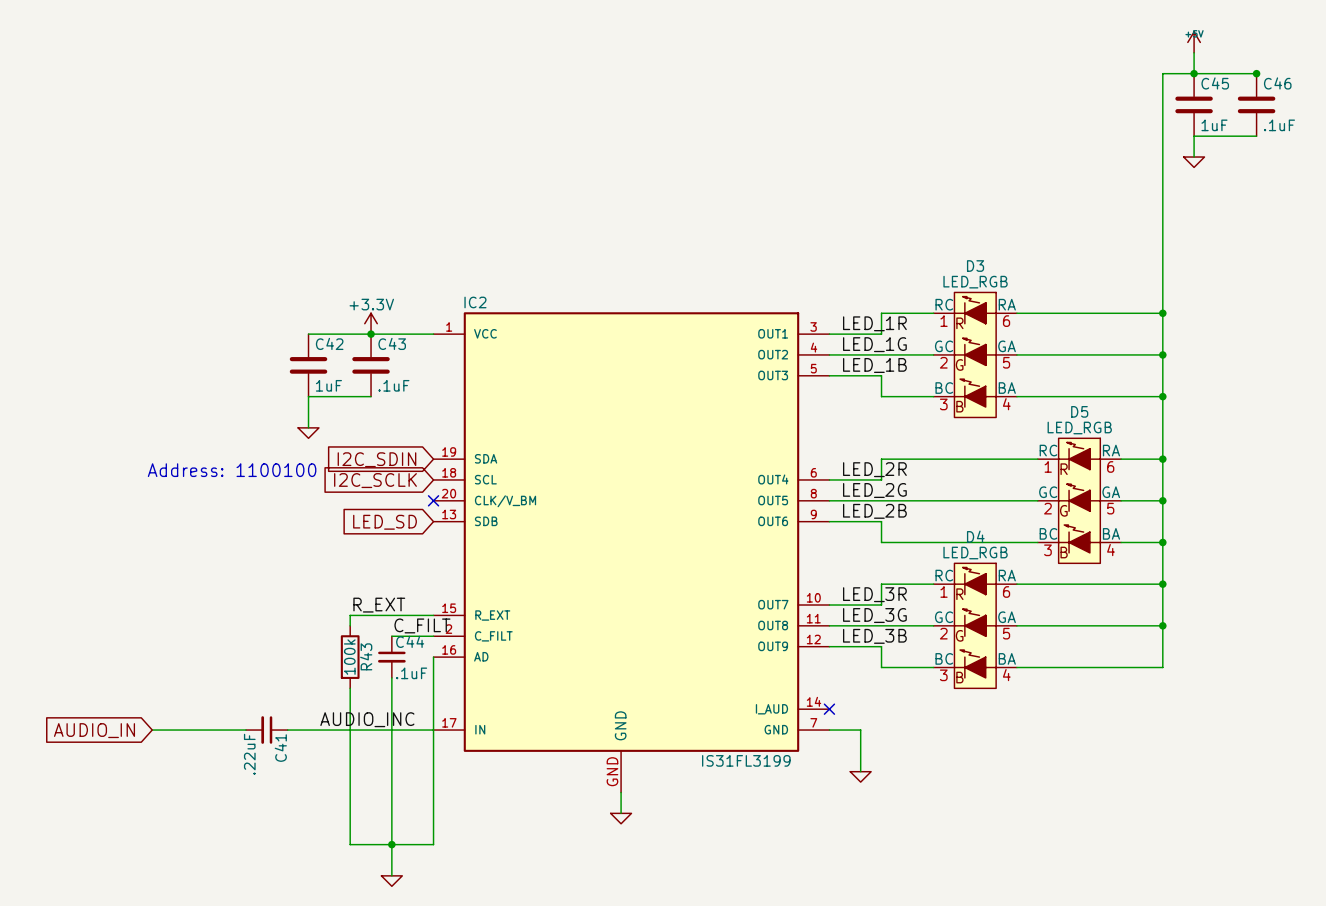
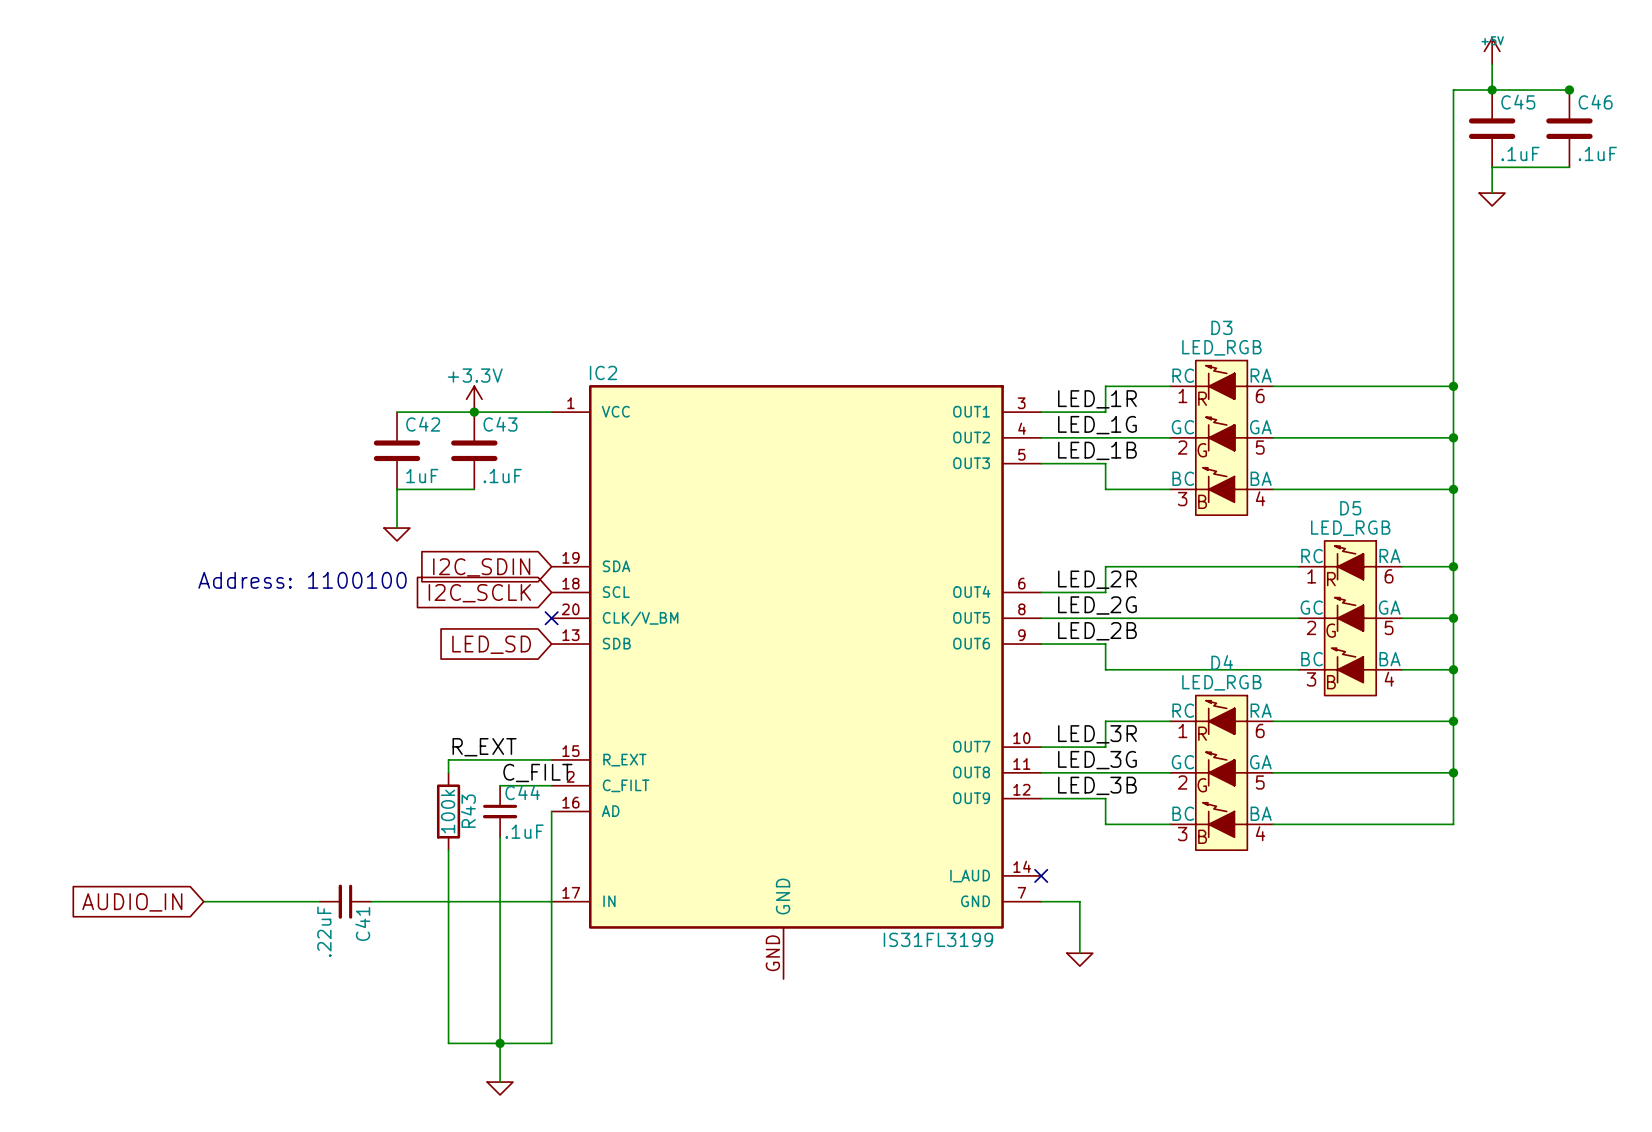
C45 value: 1uF (1214, 125) -> .1uF (1520, 153)
label: AUDIO_INC (367, 719) -> none
wire: (621, 792) (621, 813) -> none
power symbol: (621, 818) -> none

